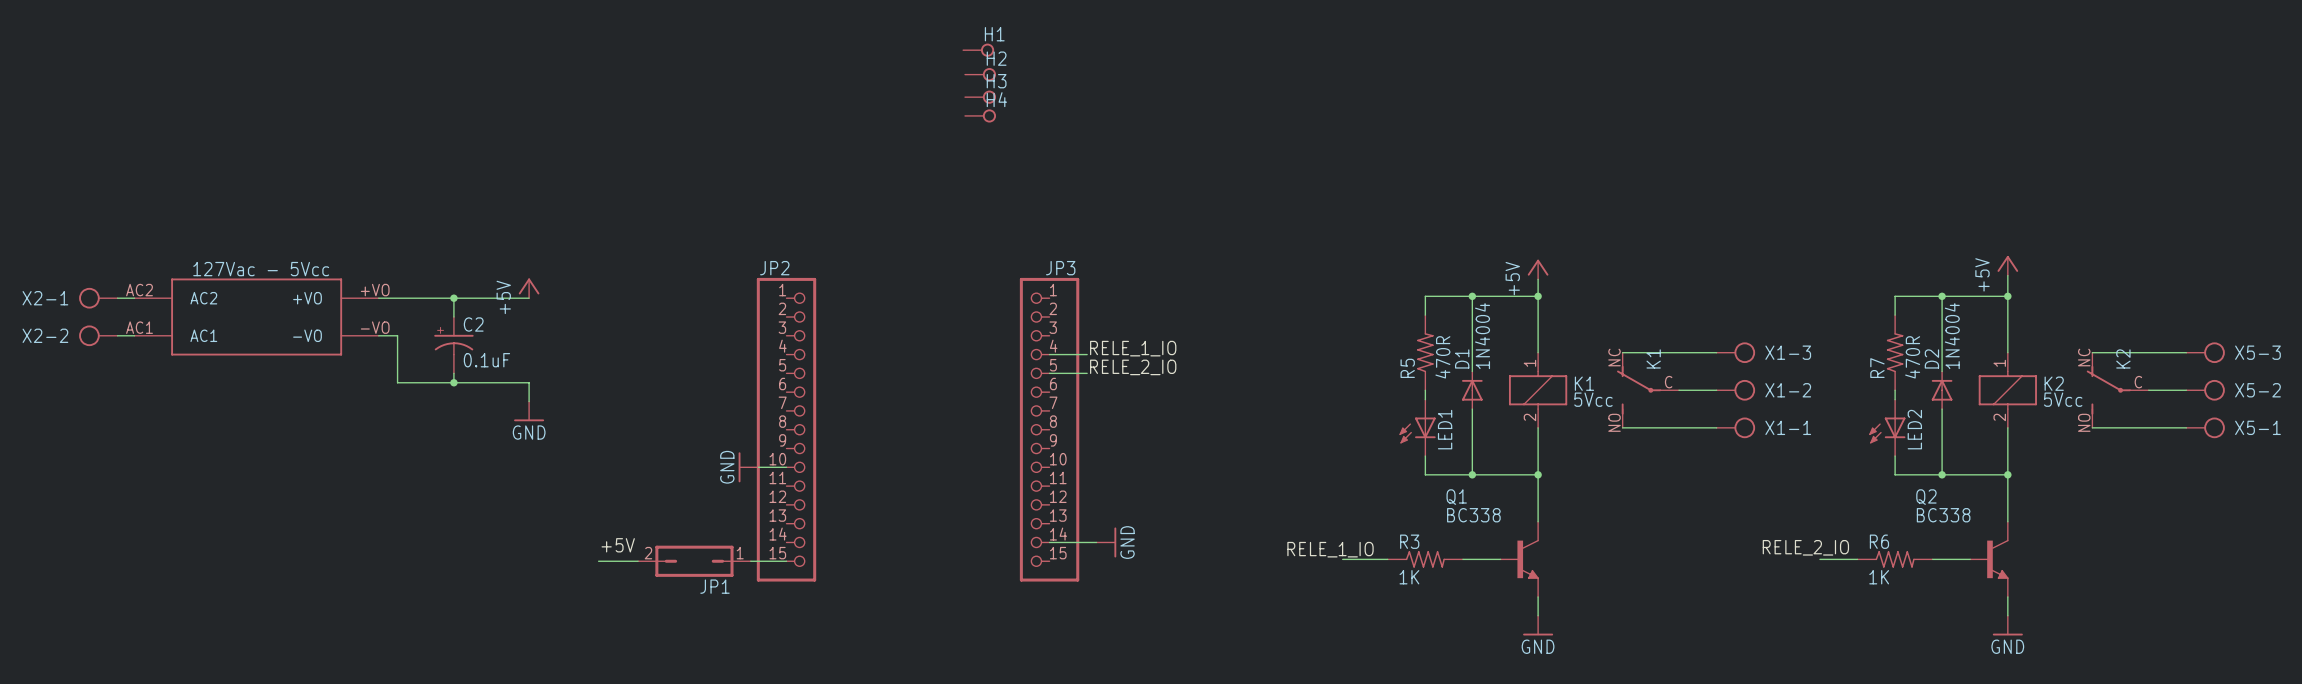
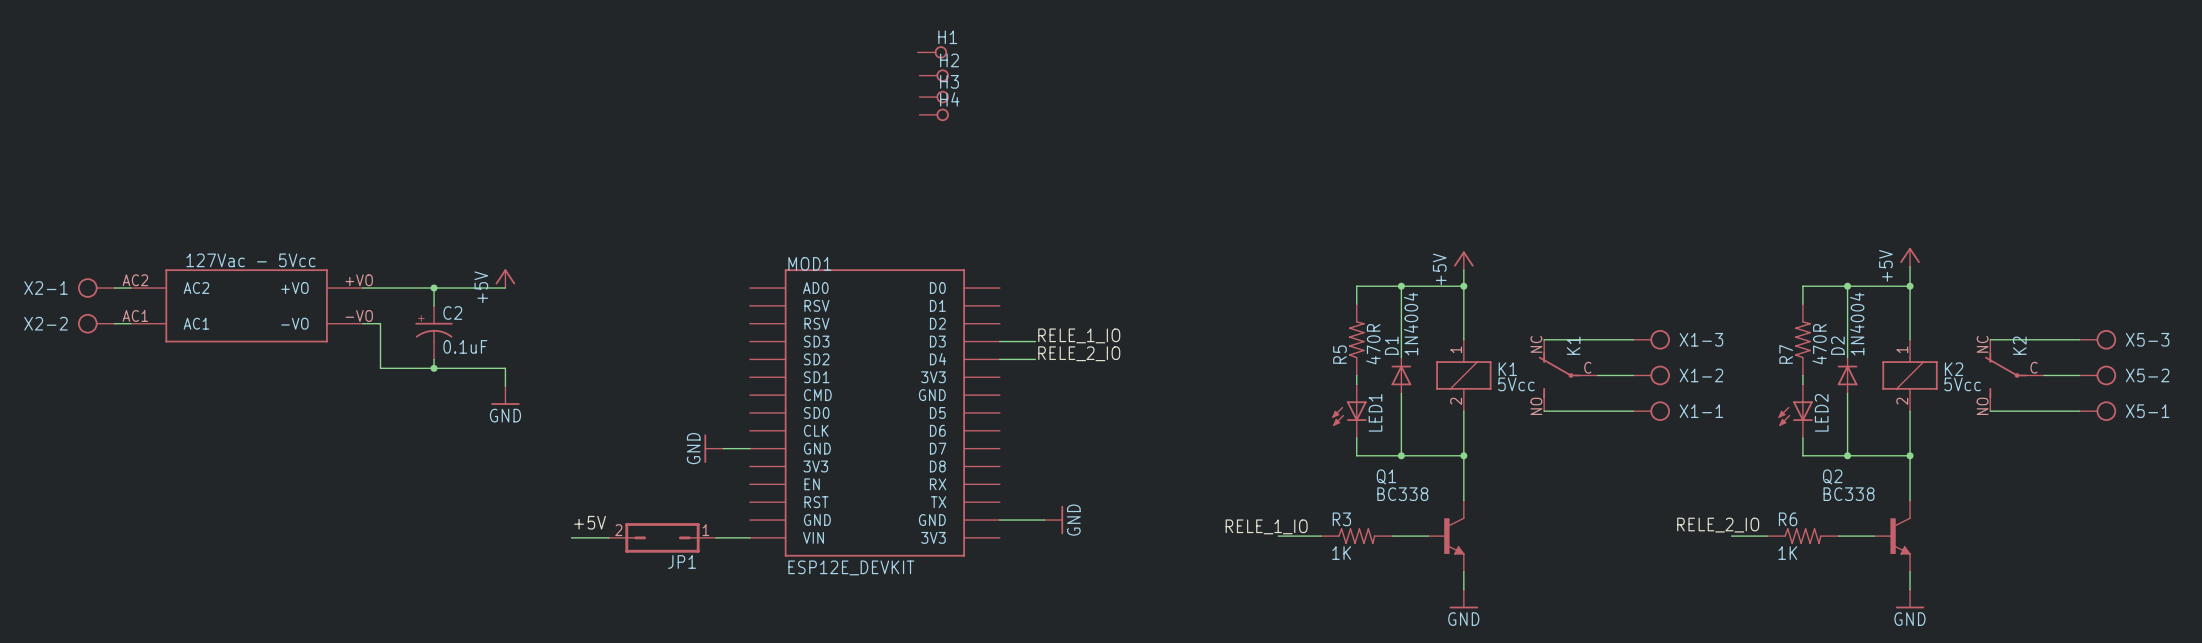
JP2: (786, 429) -> none
MOD1: none -> ESP12E_DEVKIT (874, 412)
JP3: (1049, 429) -> none

